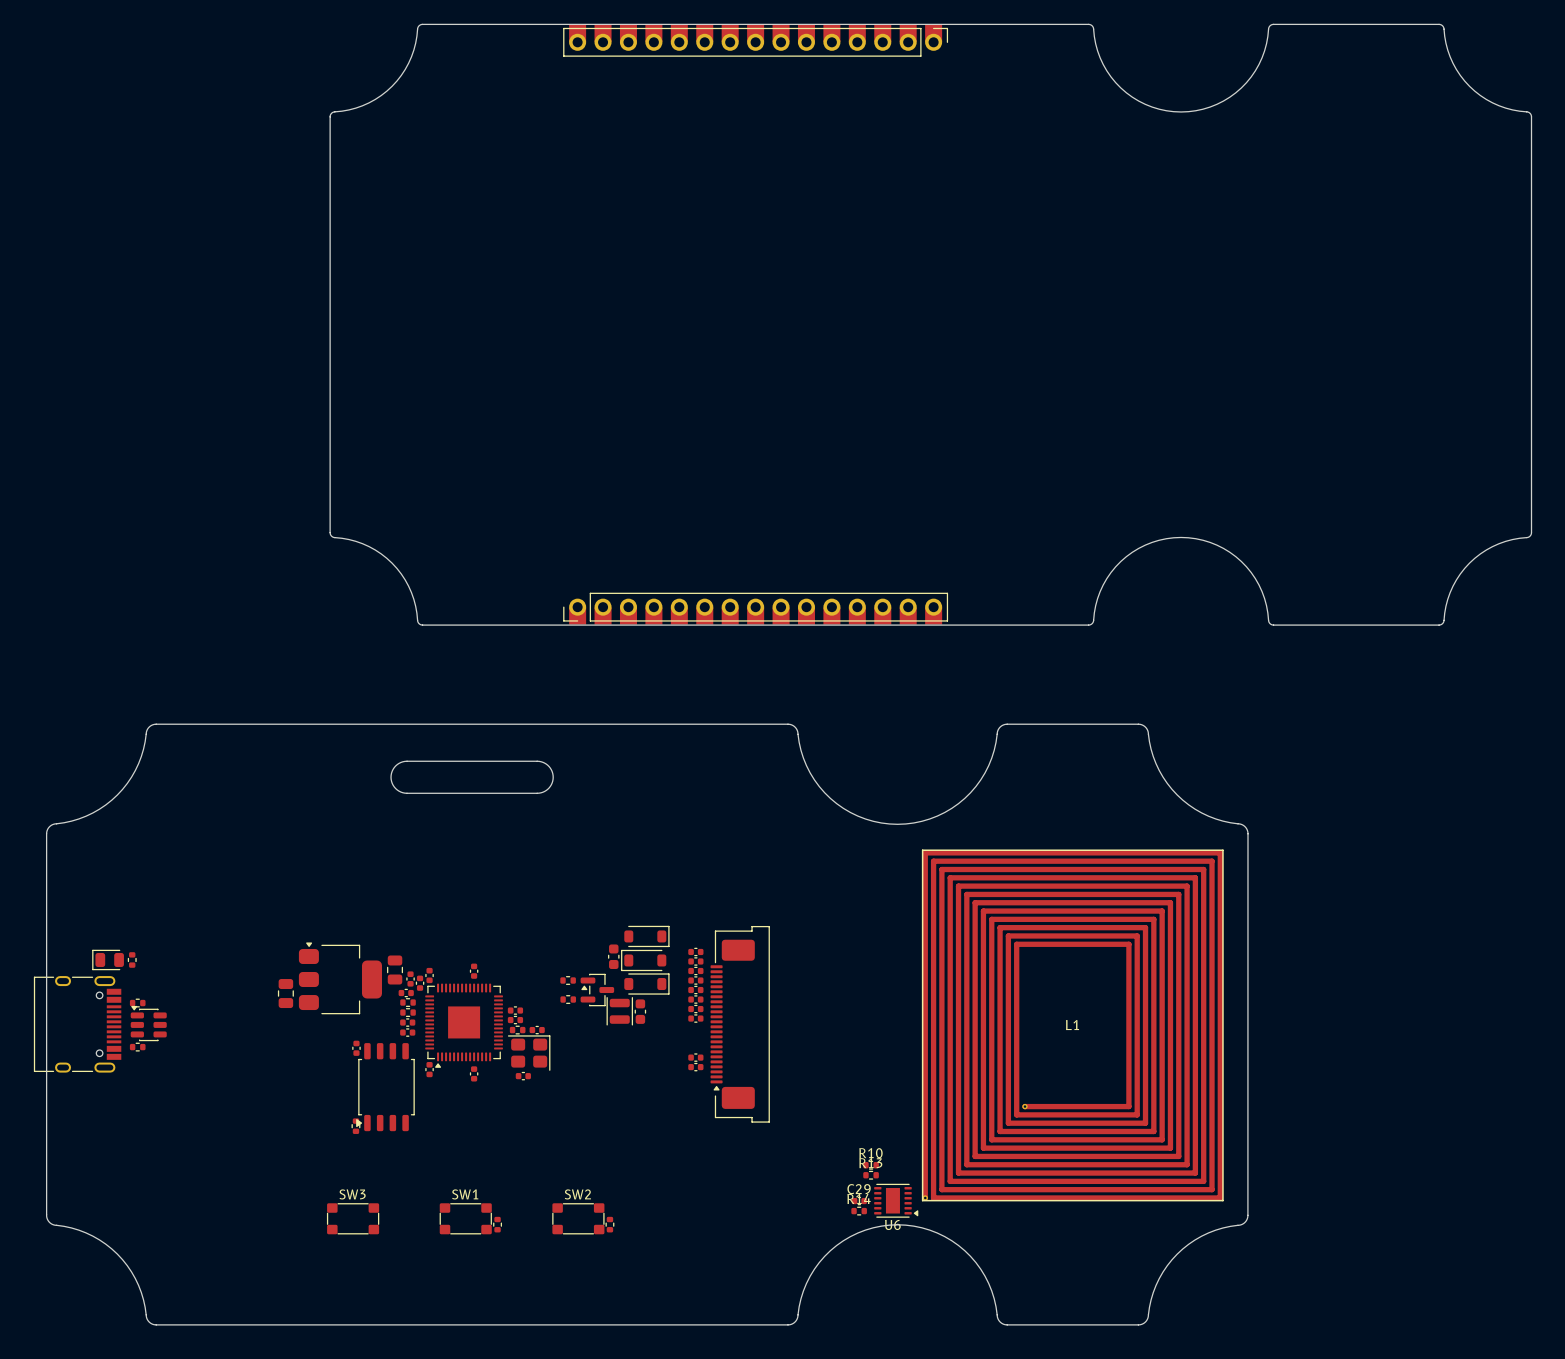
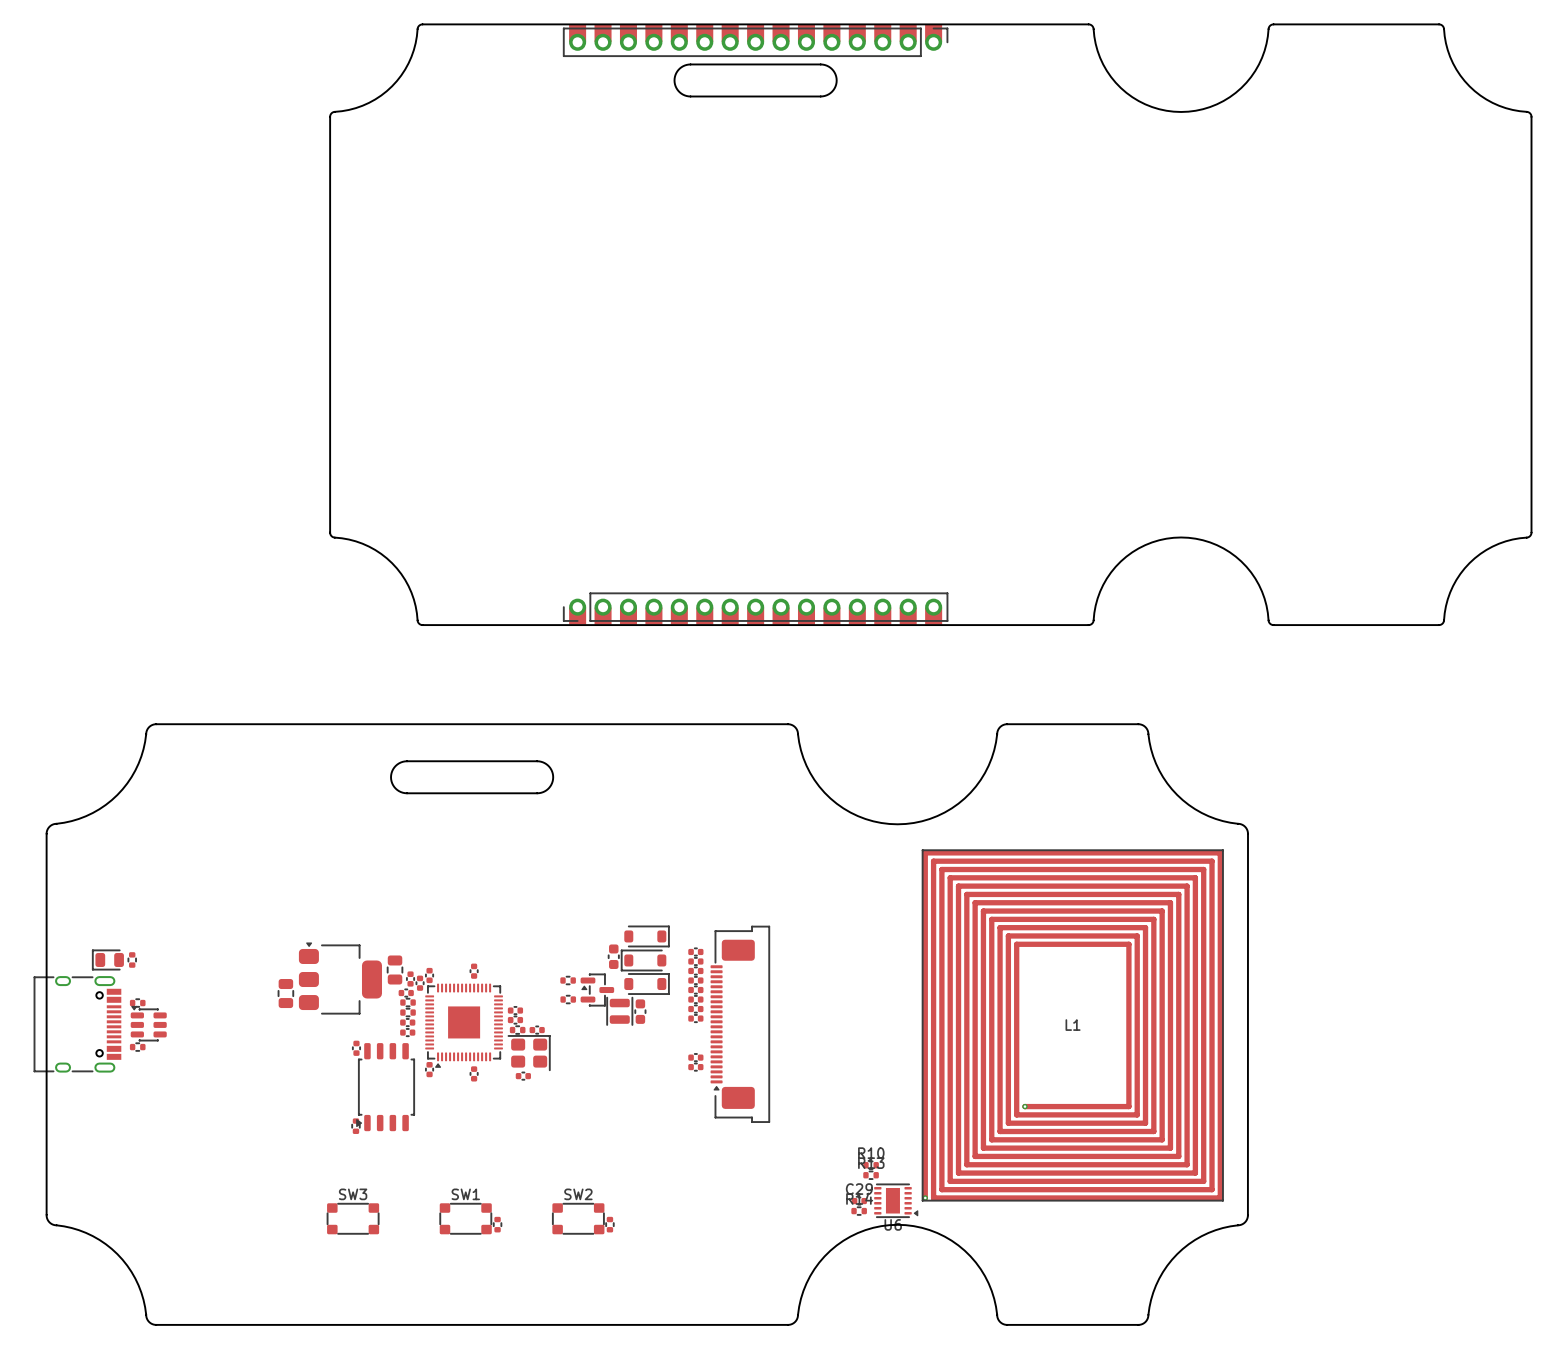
board edge: none -> (690, 64) (822, 64) (833, 70) (836, 82) (832, 91) (822, 96) (688, 96) (678, 91) (674, 80) (679, 68) (690, 64)

